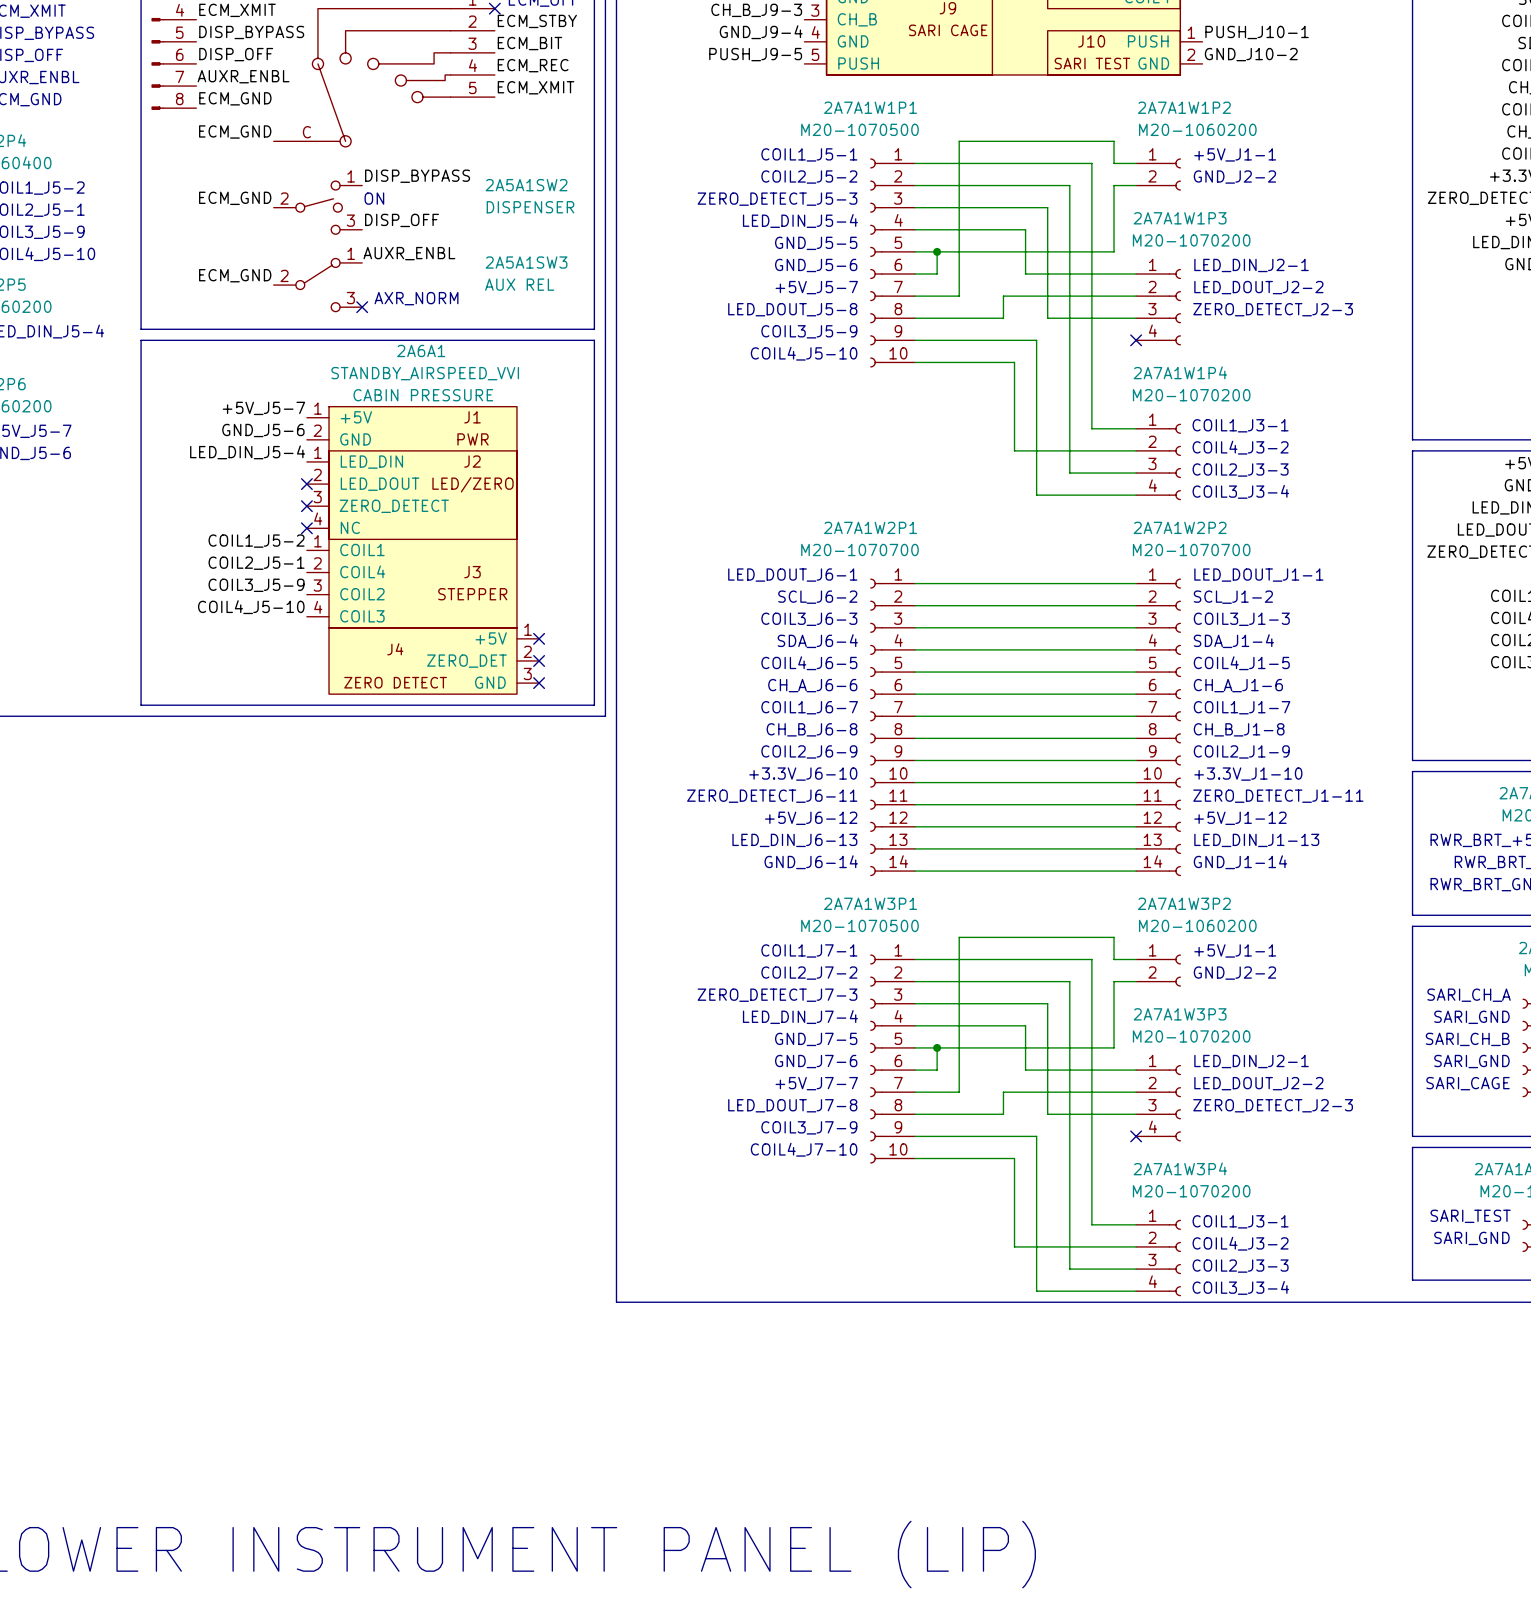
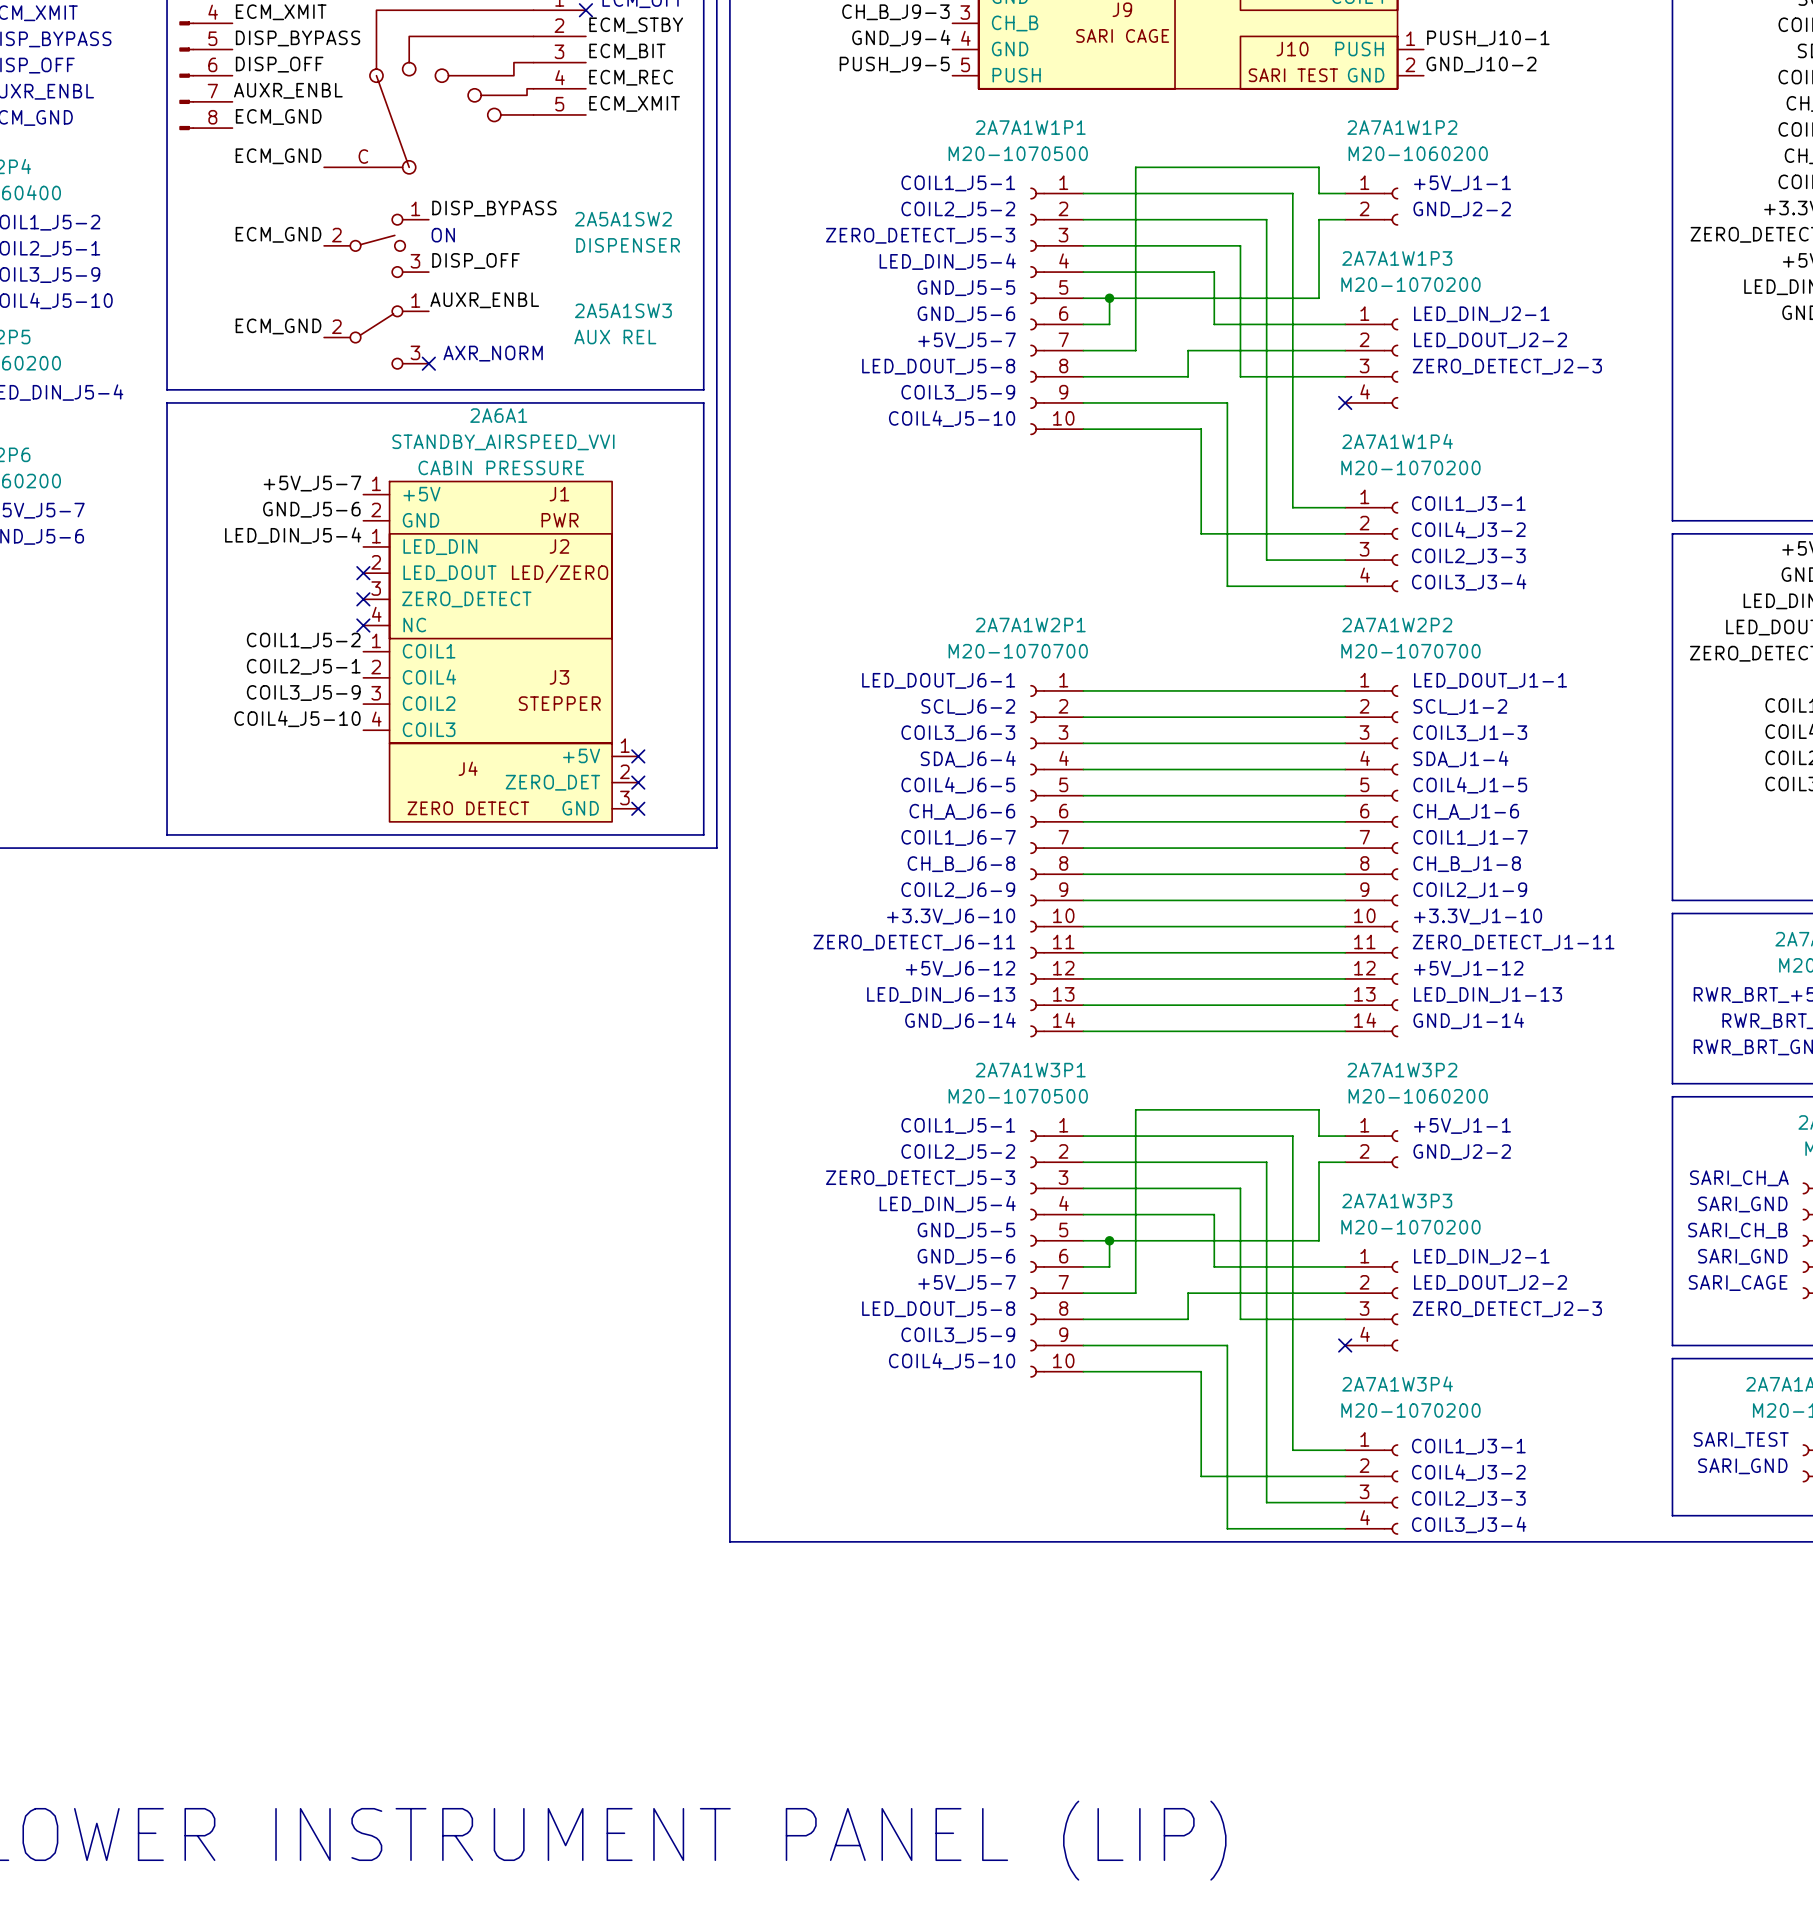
text: COIL1_J7-1 (809, 950) -> COIL1_J5-1 (958, 1125)
text: COIL2_J7-2 (809, 973) -> COIL2_J5-2 (958, 1152)
text: ZERO_DETECT_J7-3 (777, 995) -> ZERO_DETECT_J5-3 (920, 1178)
text: LED_DIN_J7-4 (800, 1017) -> LED_DIN_J5-4 (947, 1204)
text: GND_J7-5 (816, 1039) -> GND_J5-5 (966, 1230)
text: GND_J7-6 (816, 1061) -> GND_J5-6 (966, 1256)
text: +5V_J7-7 (816, 1083) -> +5V_J5-7 (967, 1283)
text: LED_DOUT_J7-8 (792, 1105) -> LED_DOUT_J5-8 (938, 1309)
text: COIL3_J7-9 (809, 1127) -> COIL3_J5-9 (958, 1335)
text: COIL4_J7-10 (804, 1149) -> COIL4_J5-10 (952, 1361)

